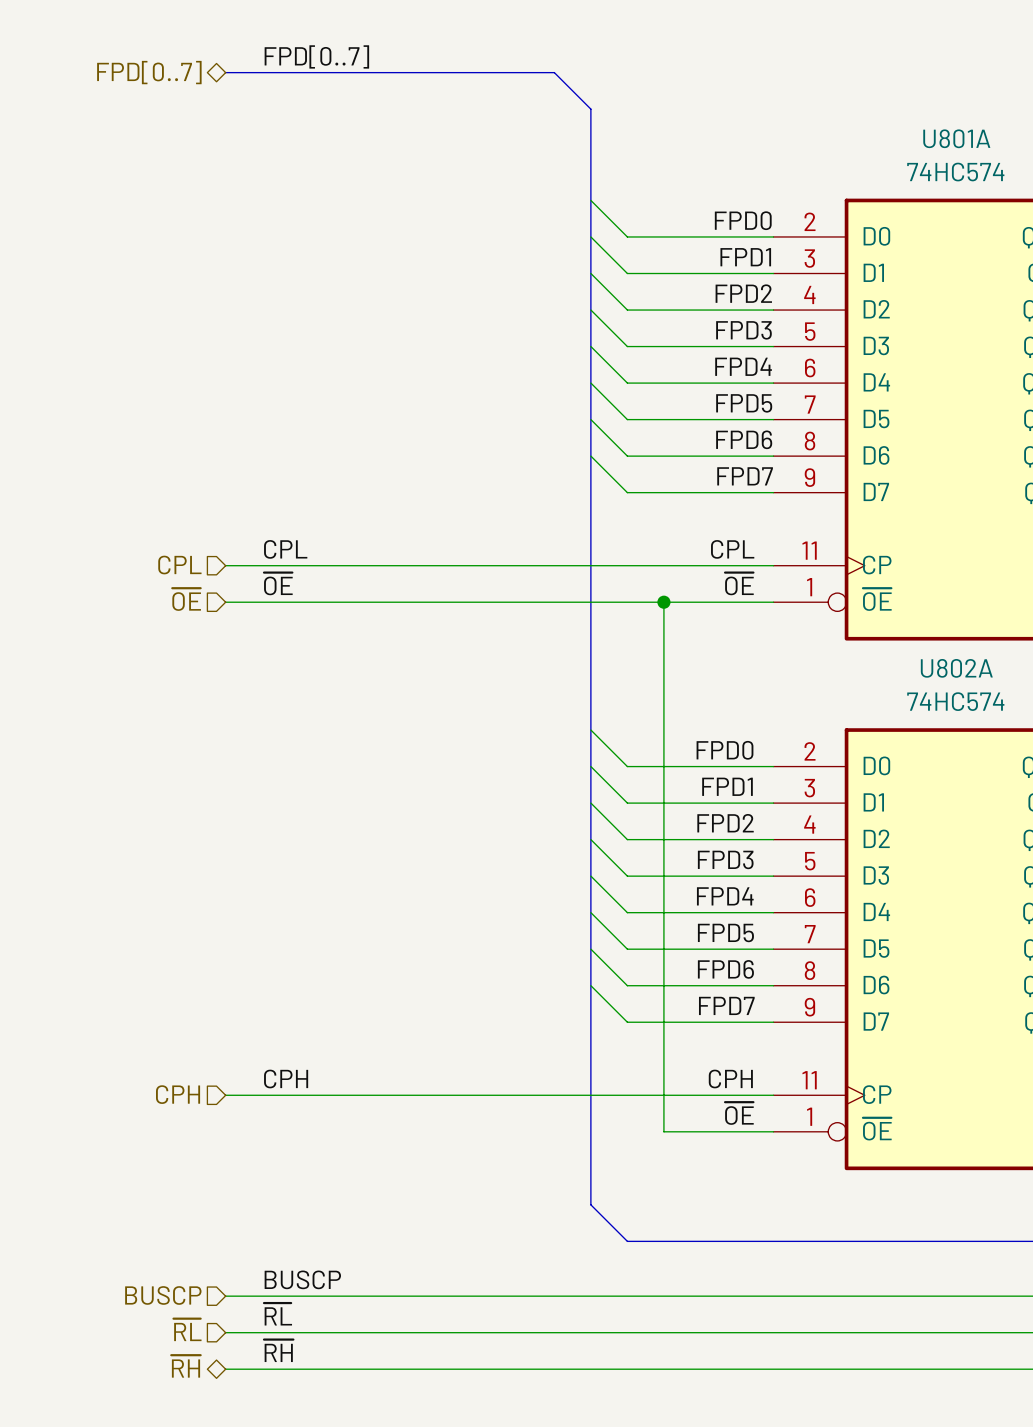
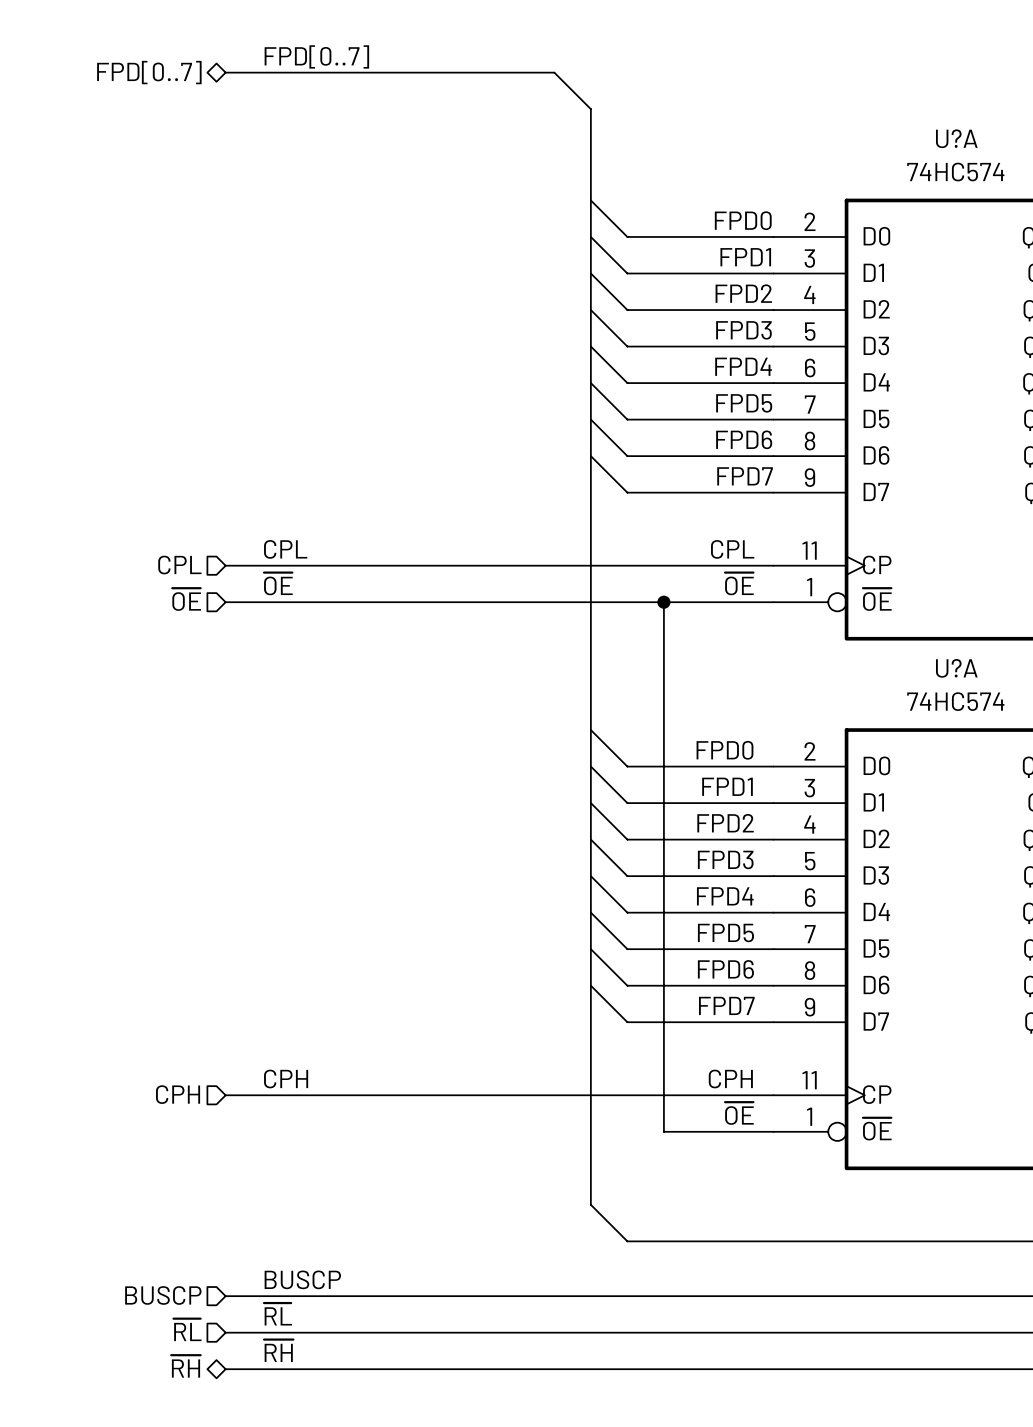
U801A name: U801A (956, 138) -> U?A (956, 138)
U802A name: U802A (956, 668) -> U?A (956, 668)

